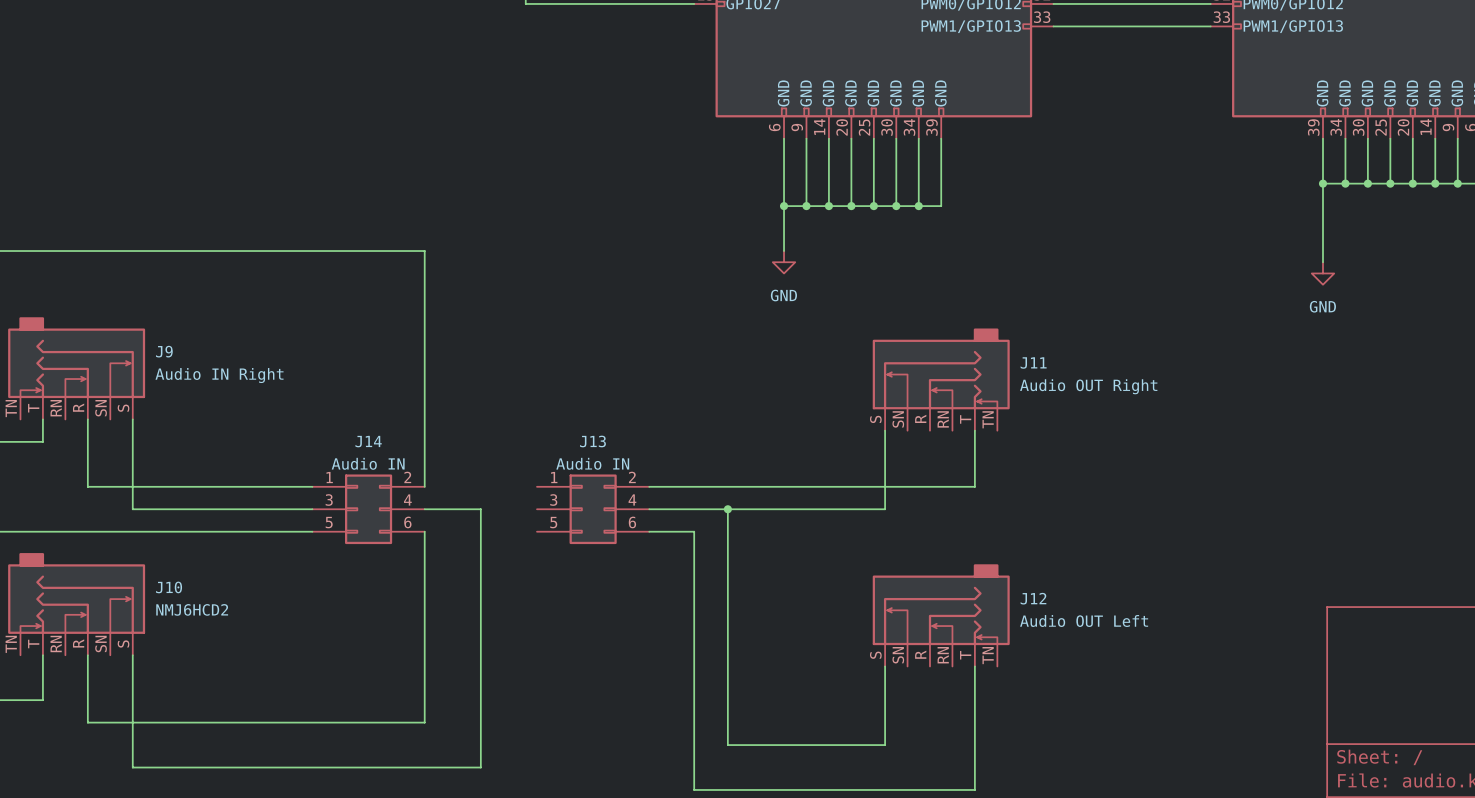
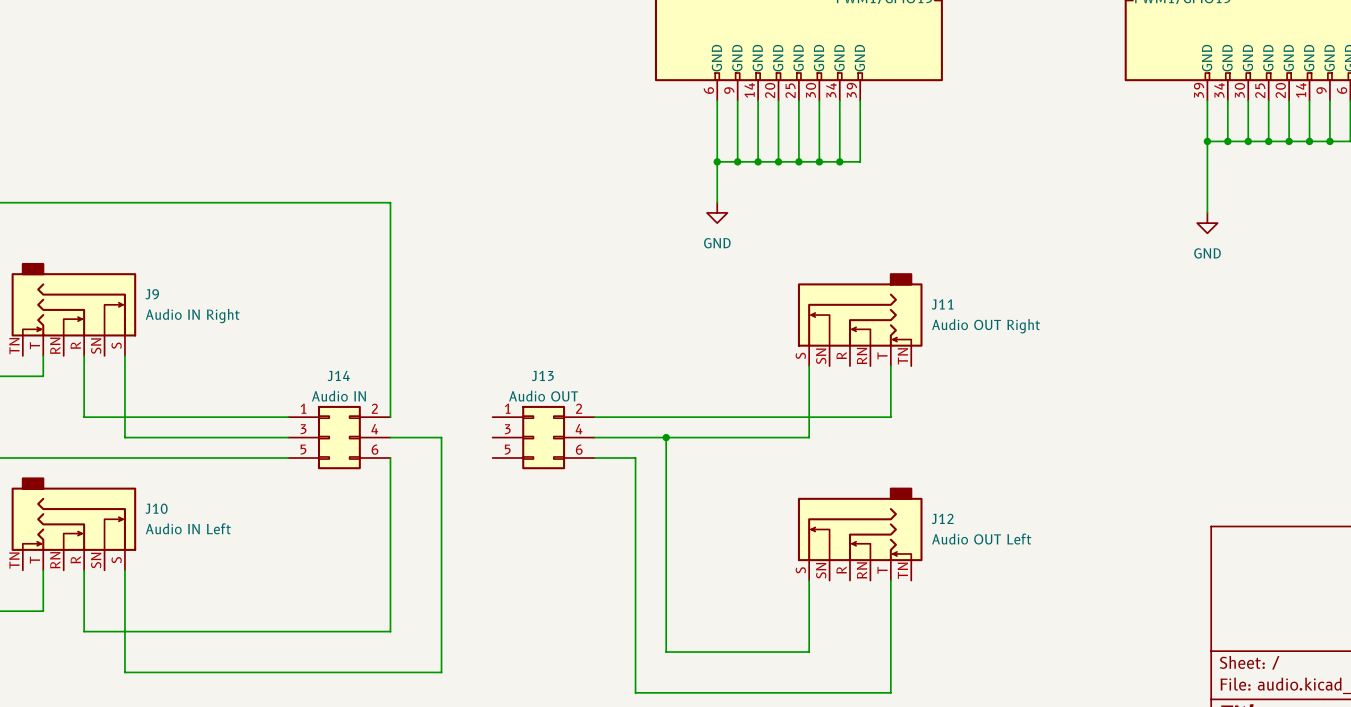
J13 value: Audio IN (592, 463) -> Audio OUT (543, 396)
J10 value: NMJ6HCD2 (192, 609) -> Audio IN Left (188, 528)

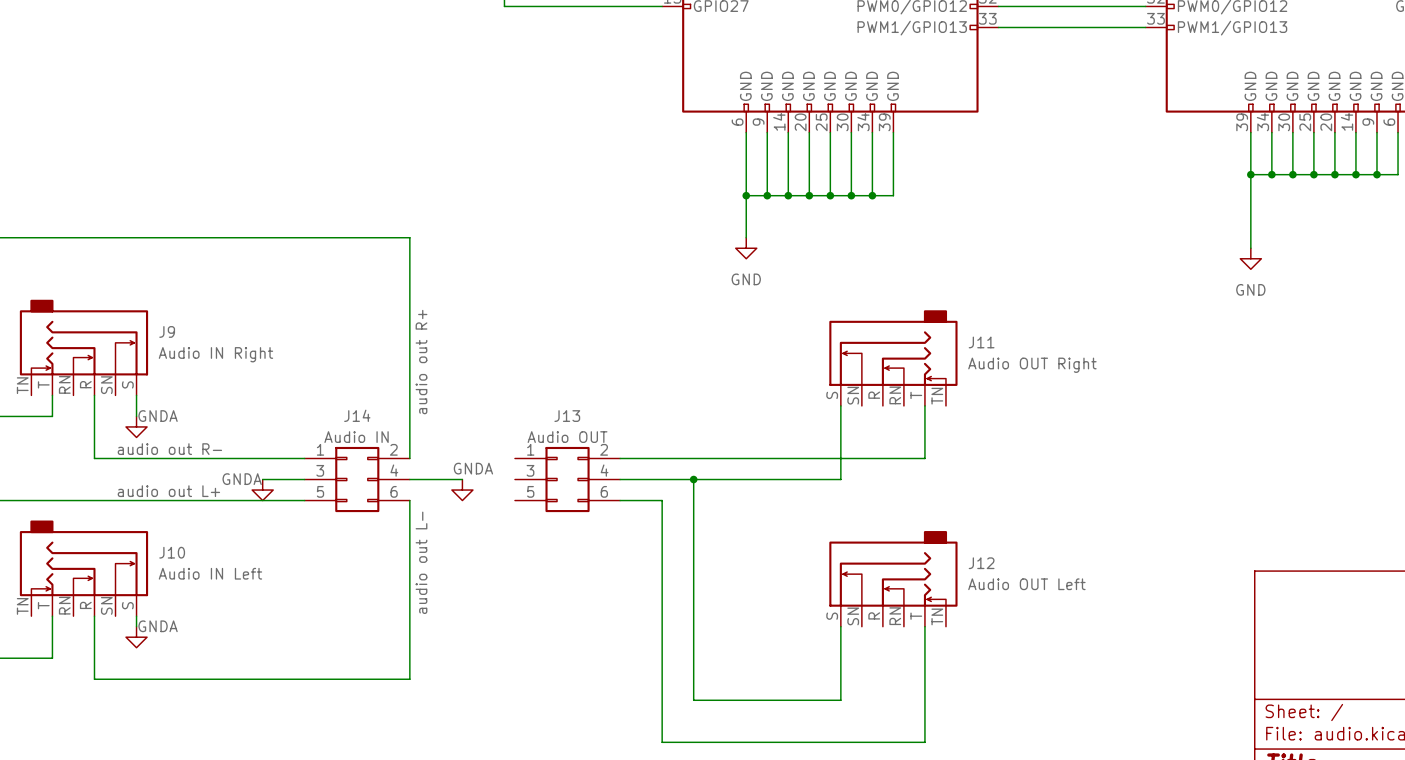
label: none -> audio out R+ (421, 362)
wire: (124, 376) (124, 437) (247, 437) -> none
power symbol: none -> GNDA (136, 426)
label: none -> audio out R- (169, 449)
wire: (441, 437) (441, 672) (124, 672) (124, 580) -> none
power symbol: none -> GNDA (262, 490)
power symbol: none -> GNDA (462, 490)
label: none -> audio out L+ (168, 491)
label: none -> audio out L- (421, 562)
power symbol: none -> GNDA (136, 637)

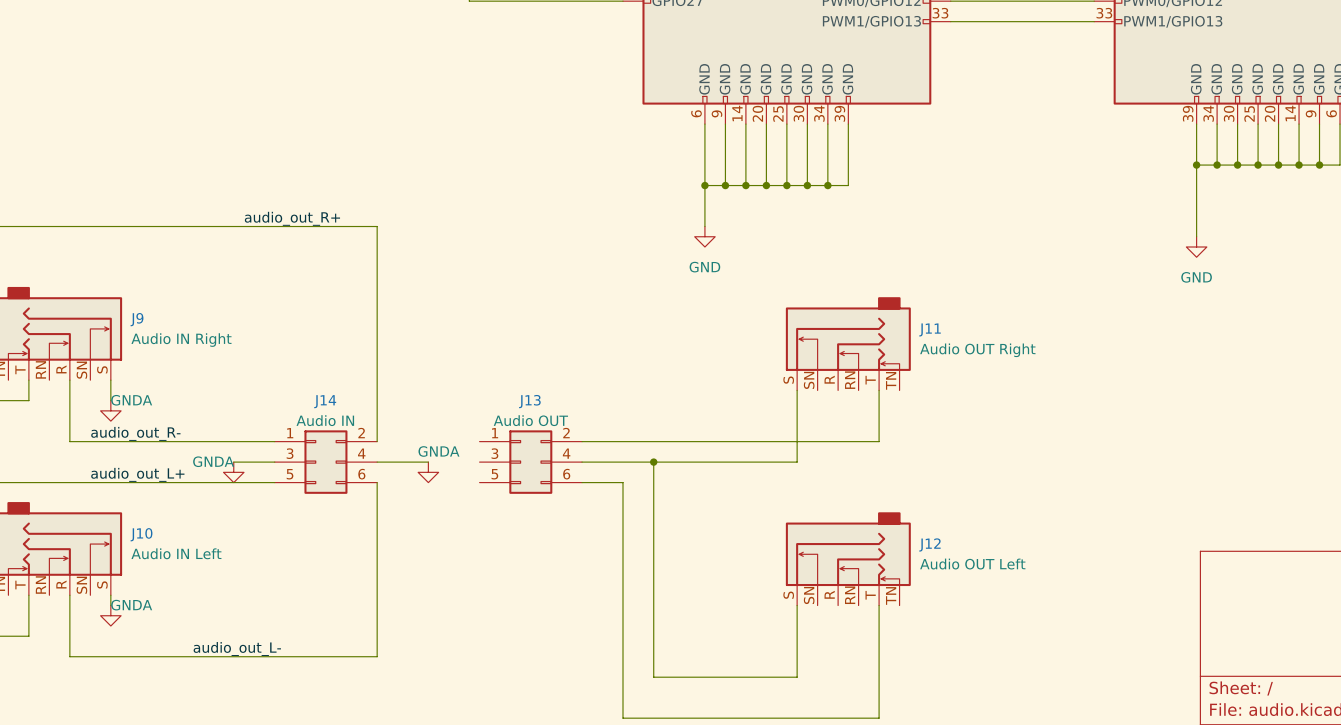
label: none -> audio_out_R+ (292, 218)
label: audio out R+ (421, 362) -> none
label: audio out R- (169, 449) -> audio_out_R- (135, 433)
label: audio out L+ (168, 491) -> audio_out_L+ (137, 474)
label: audio out L- (421, 562) -> none
label: none -> audio_out_L- (237, 649)

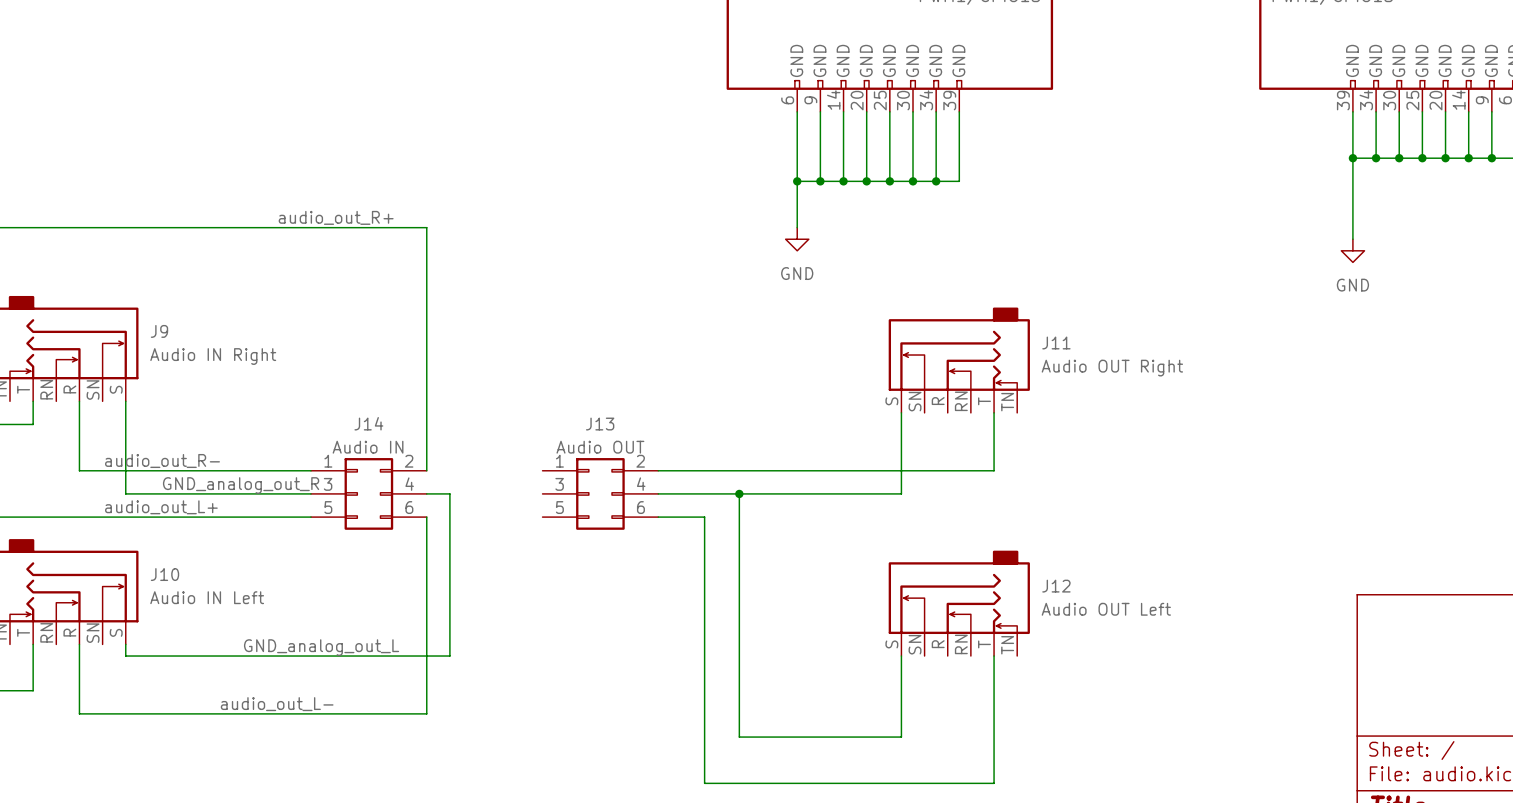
wire: none -> (125, 424) (125, 493) (264, 493)
power symbol: GNDA (110, 410) -> none
label: none -> GND_analog_out_R (241, 485)
wire: (397, 462) (428, 462) -> (449, 493) (449, 656) (125, 656)
power symbol: GNDA (233, 472) -> none
power symbol: GNDA (428, 472) -> none
label: none -> GND_analog_out_L (321, 647)
power symbol: GNDA (110, 615) -> none

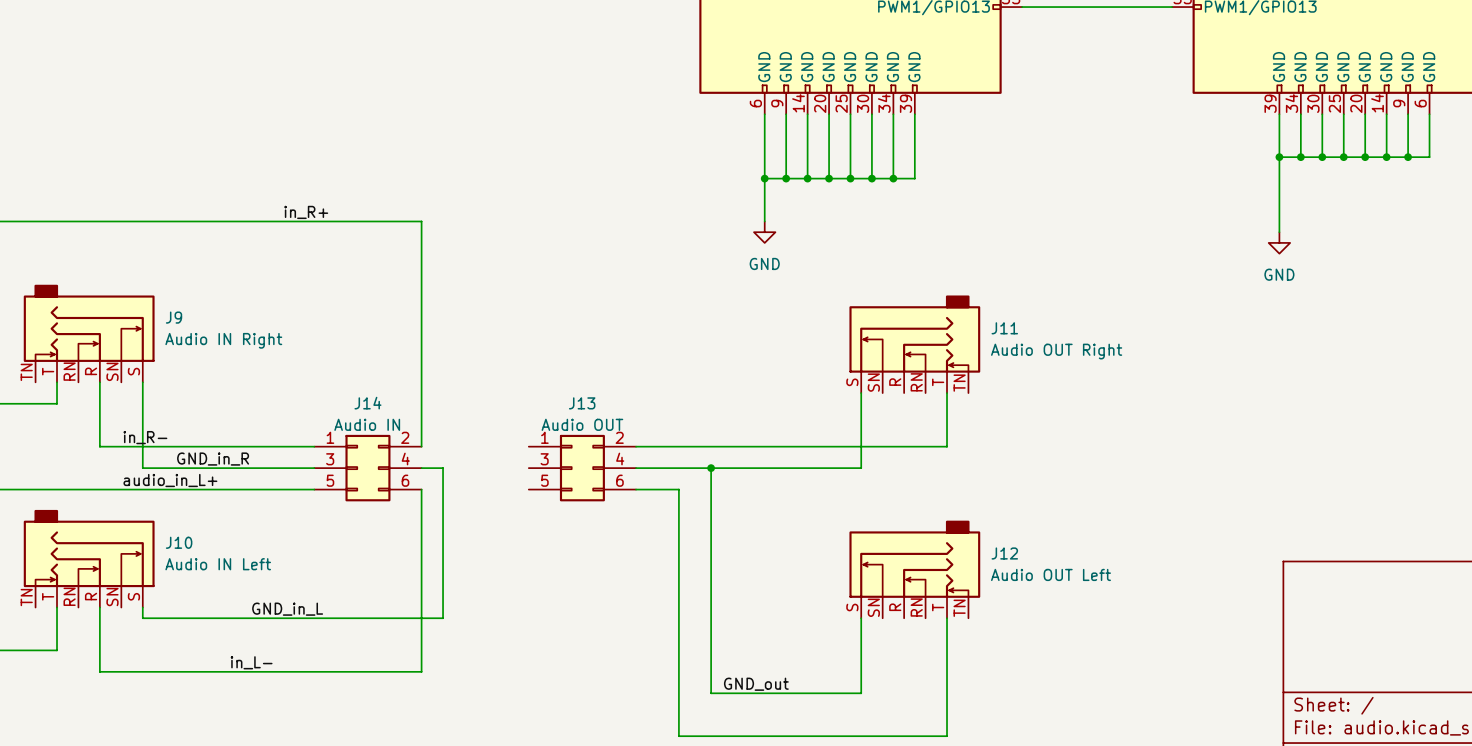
label: audio_out_R+ (336, 217) -> in_R+ (306, 212)
label: audio_out_R- (162, 461) -> in_R- (145, 437)
label: GND_analog_out_R (241, 485) -> GND_in_R (213, 459)
label: audio_out_L+ (161, 507) -> audio_in_L+ (170, 480)
label: GND_analog_out_L (321, 647) -> GND_in_L (287, 609)
label: audio_out_L- (277, 704) -> in_L- (251, 662)
label: none -> GND_out (756, 684)

